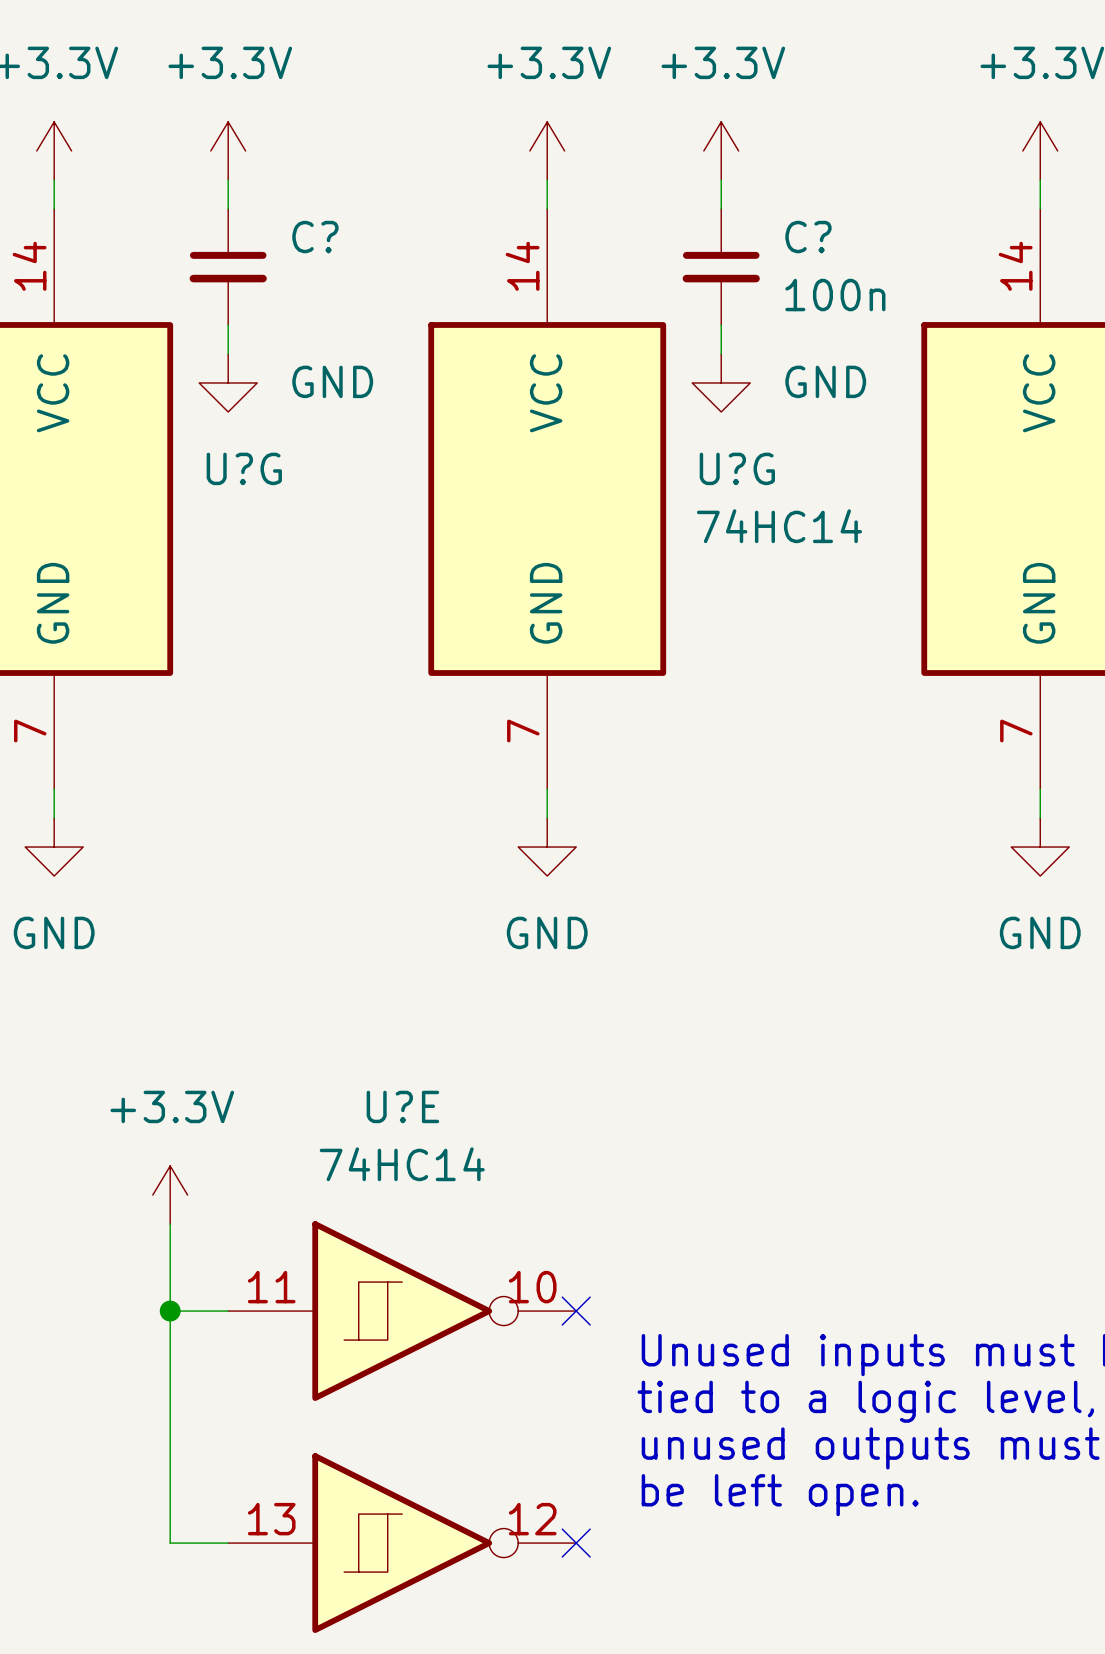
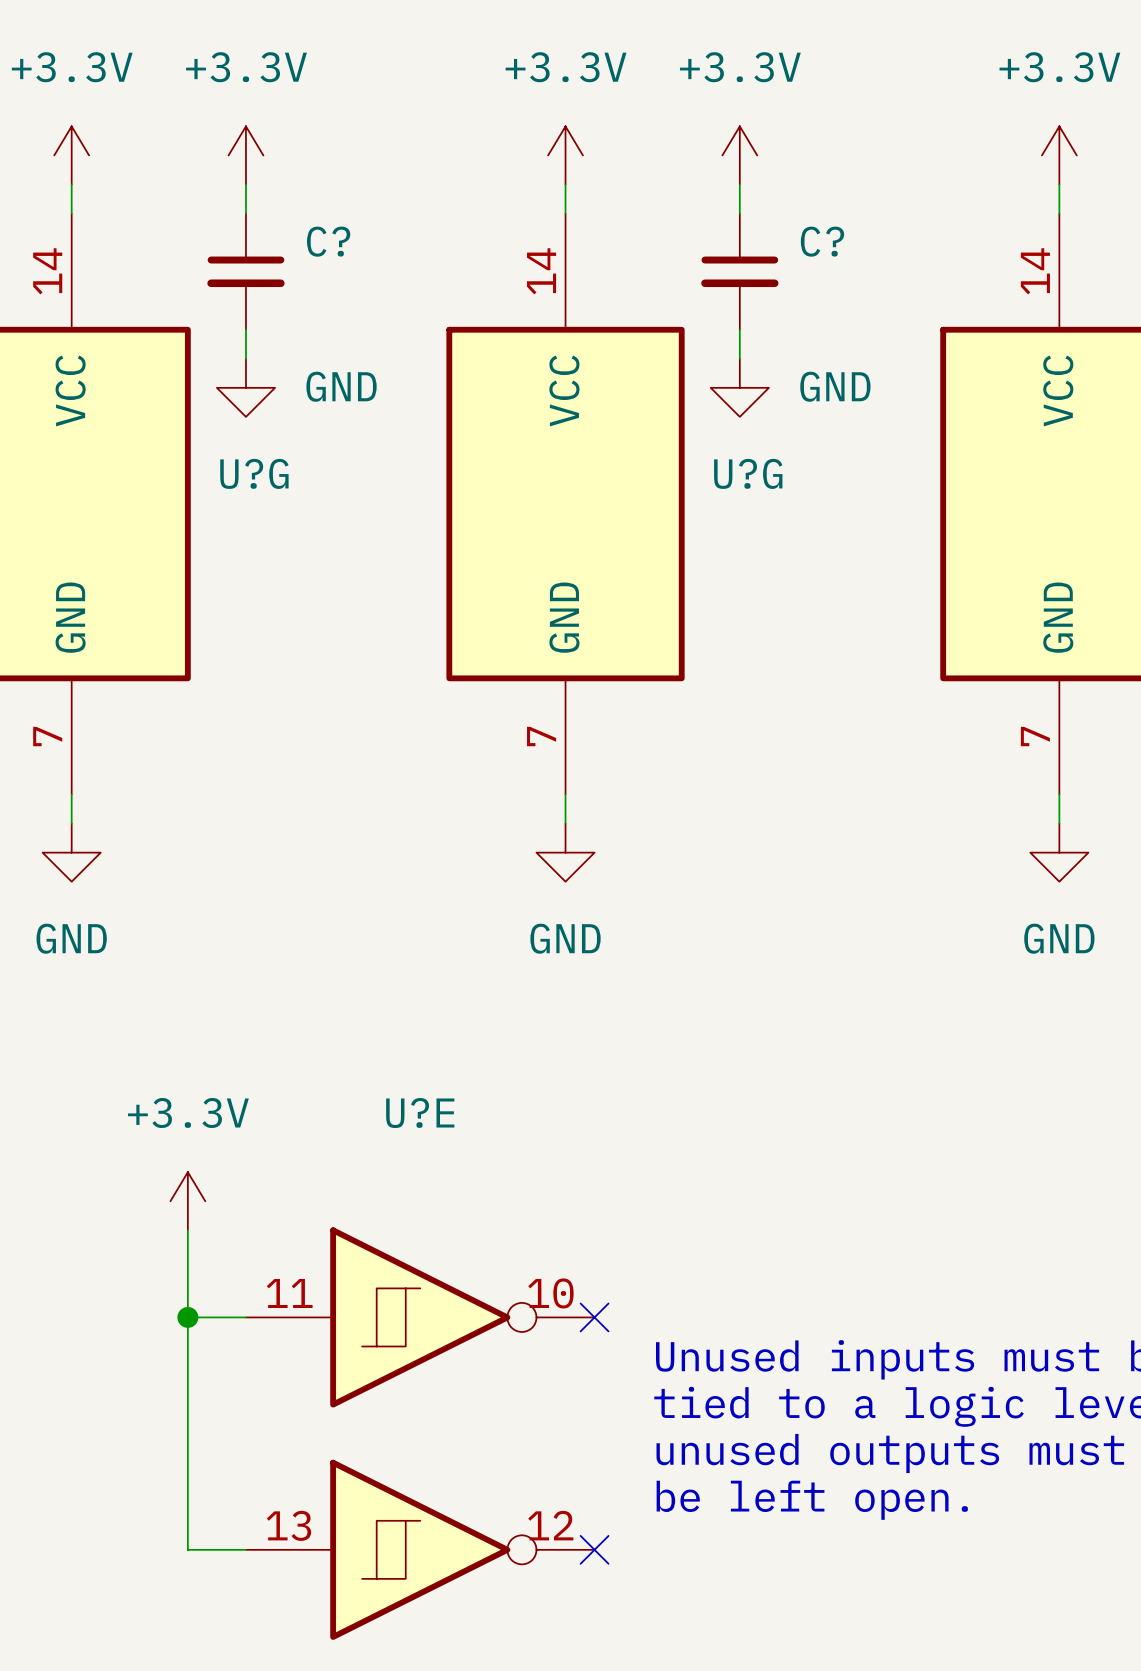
C? value: 100n (835, 295) -> none
U?G value: 74HC14 (779, 526) -> none
U?E value: 74HC14 (402, 1164) -> none

